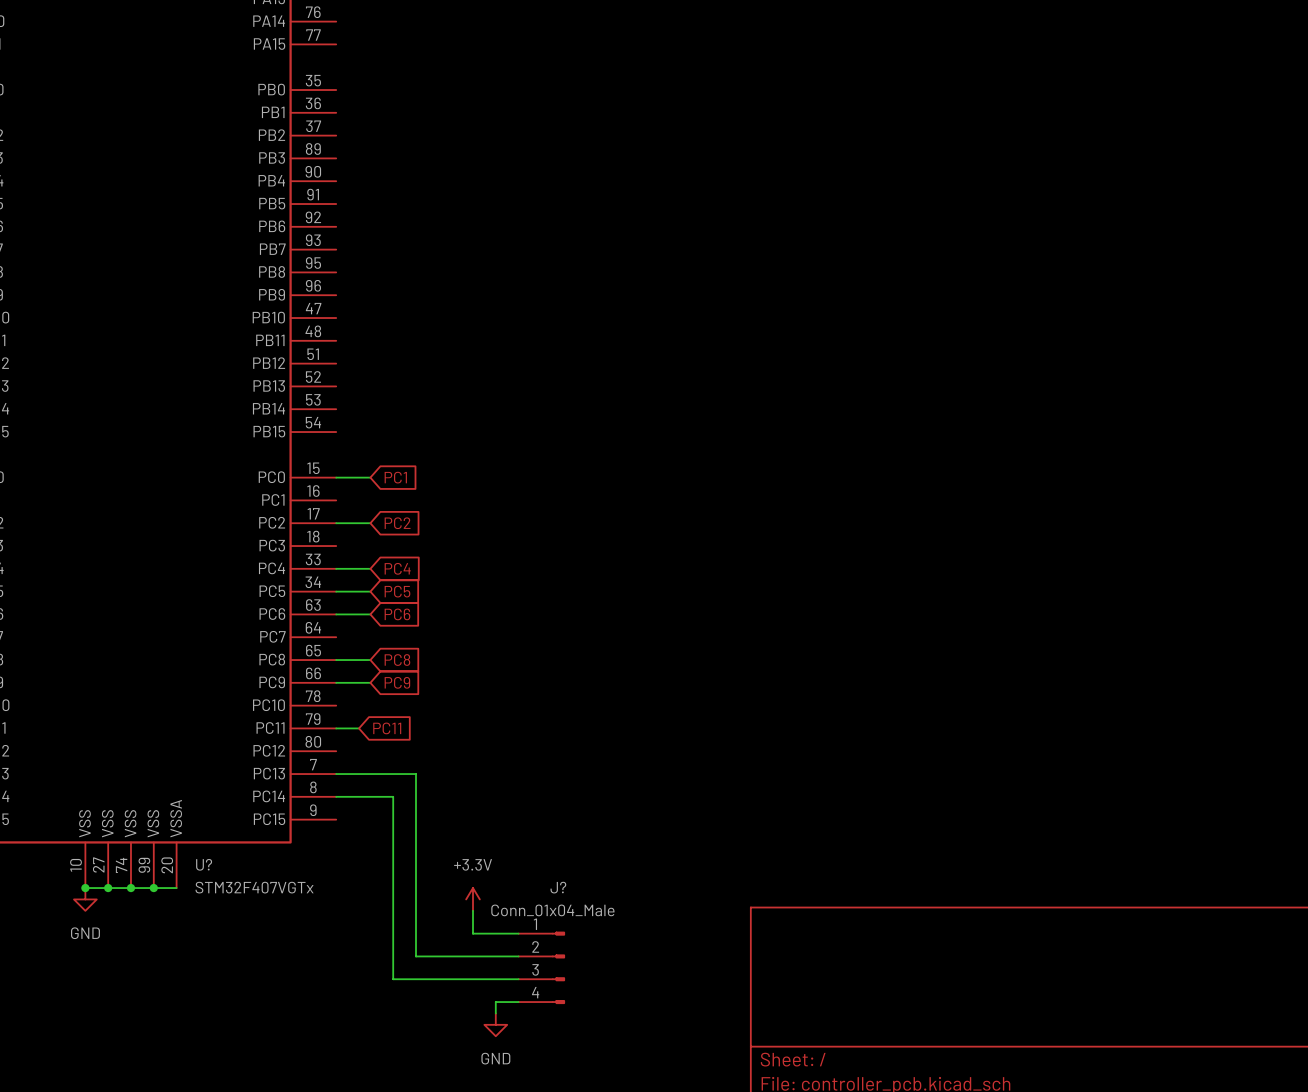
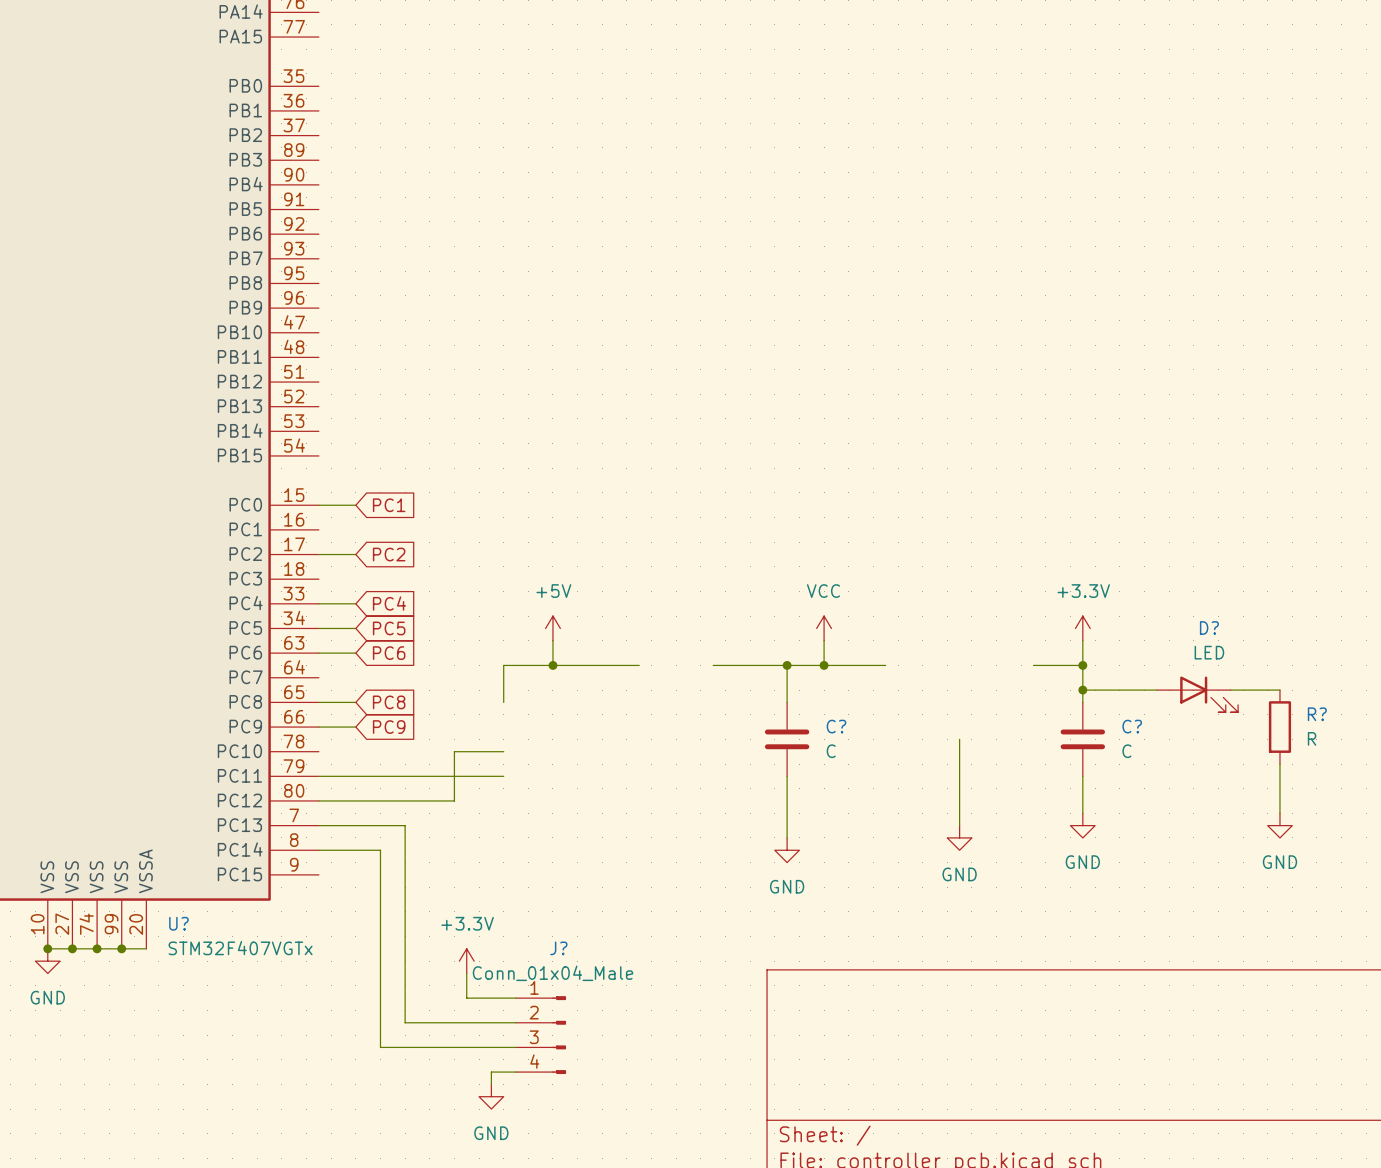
power symbol: none -> +5V (552, 628)
power symbol: none -> VCC (824, 628)
power symbol: none -> +3.3V (1082, 628)
wire: none -> (552, 640) (552, 665)
wire: none -> (824, 640) (824, 665)
wire: none -> (1082, 640) (1082, 702)
junction: none -> (552, 665)
wire: none -> (639, 665) (503, 665) (503, 702)
wire: none -> (713, 665) (885, 665)
wire: none -> (787, 665) (787, 702)
junction: none -> (787, 665)
junction: none -> (824, 665)
wire: none -> (1033, 665) (1082, 665)
junction: none -> (1082, 665)
wire: none -> (1082, 690) (1156, 690)
junction: none -> (1082, 690)
wire: none -> (1230, 690) (1279, 690)
D?: none -> LED (1197, 694)
R?: none -> R (1279, 727)
C?: none -> C (787, 739)
wire: none -> (959, 739) (959, 825)
C?: none -> C (1082, 739)
wire: none -> (503, 751) (454, 751) (454, 800) (318, 800)
wire: none -> (1279, 764) (1279, 813)
wire: none -> (343, 776) (503, 776)
global label: PC11 (387, 728) -> none
wire: none -> (787, 776) (787, 837)
wire: none -> (1082, 776) (1082, 813)
power symbol: none -> GND (1082, 825)
power symbol: none -> GND (1279, 825)
power symbol: none -> GND (959, 837)
power symbol: none -> GND (787, 850)

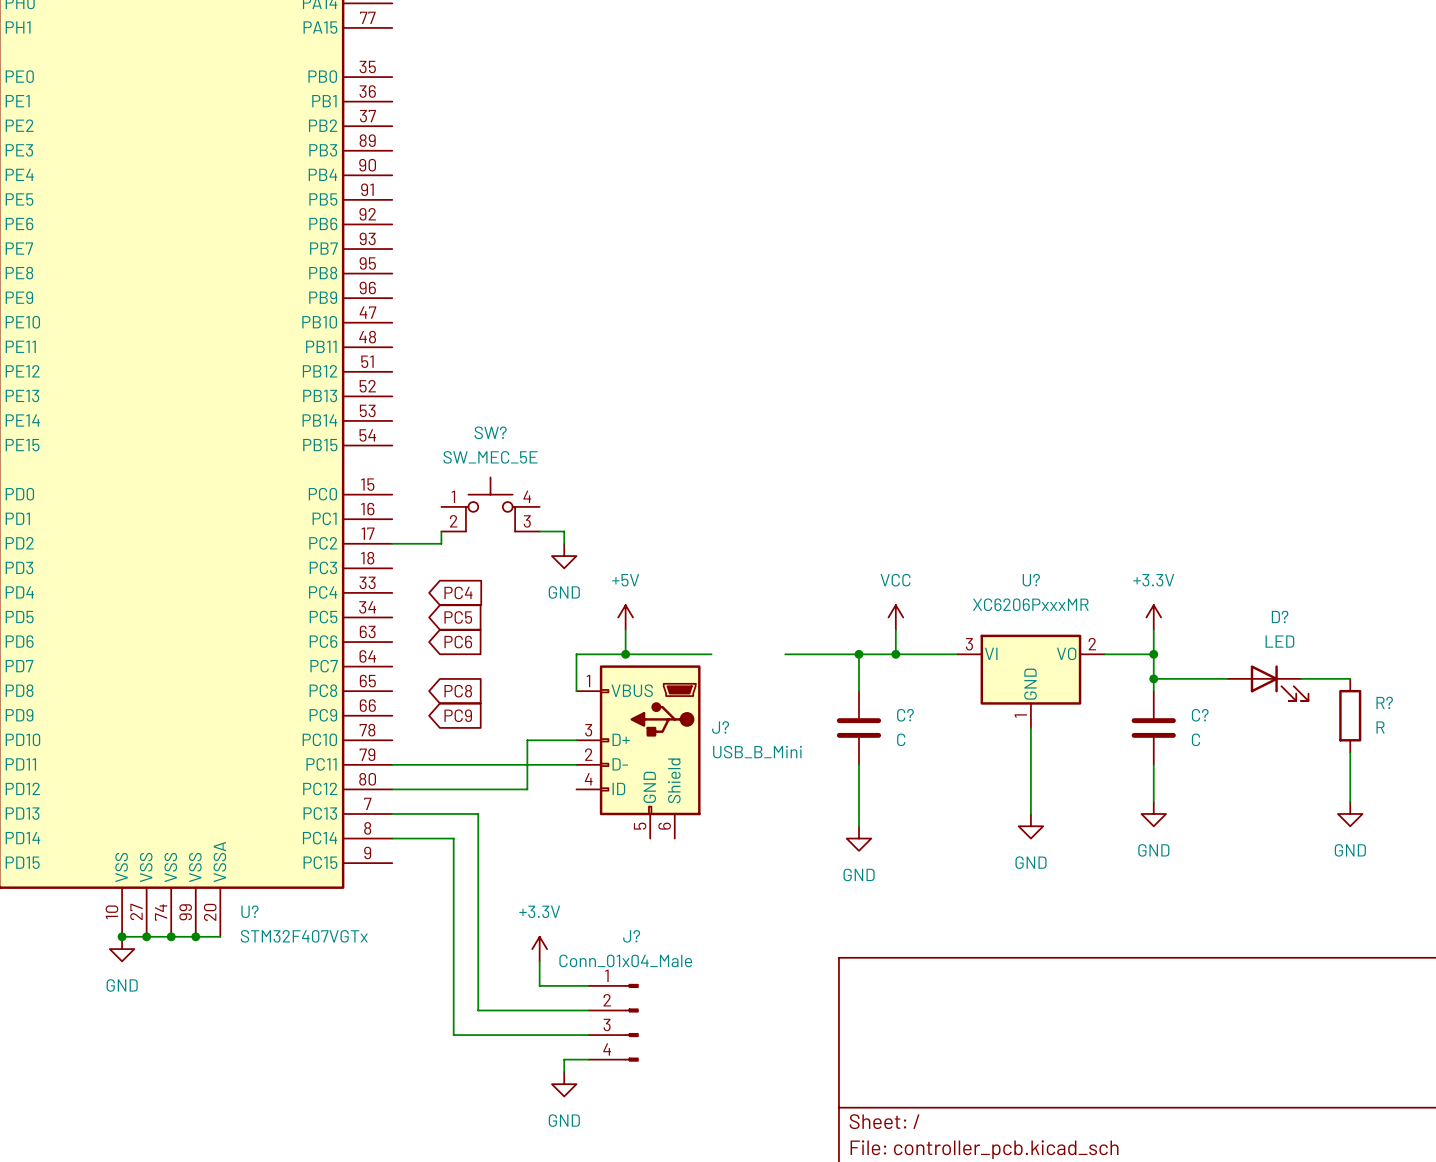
wire: (318, 505) (355, 505) -> none
global label: PC1 (389, 505) -> none
SW?: none -> SW_MEC_5E (490, 504)
wire: none -> (441, 531) (441, 543) (429, 543)
wire: none -> (539, 531) (564, 531) (564, 543)
global label: PC2 (389, 554) -> none
power symbol: none -> GND (564, 556)
wire: (318, 603) (355, 603) -> none
wire: (318, 628) (355, 628) -> none
wire: (318, 653) (355, 653) -> none
U?: none -> XC6206PxxxMR (1030, 681)
wire: (318, 702) (355, 702) -> none
wire: (318, 727) (355, 727) -> none
J?: none -> USB_B_Mini (638, 751)

